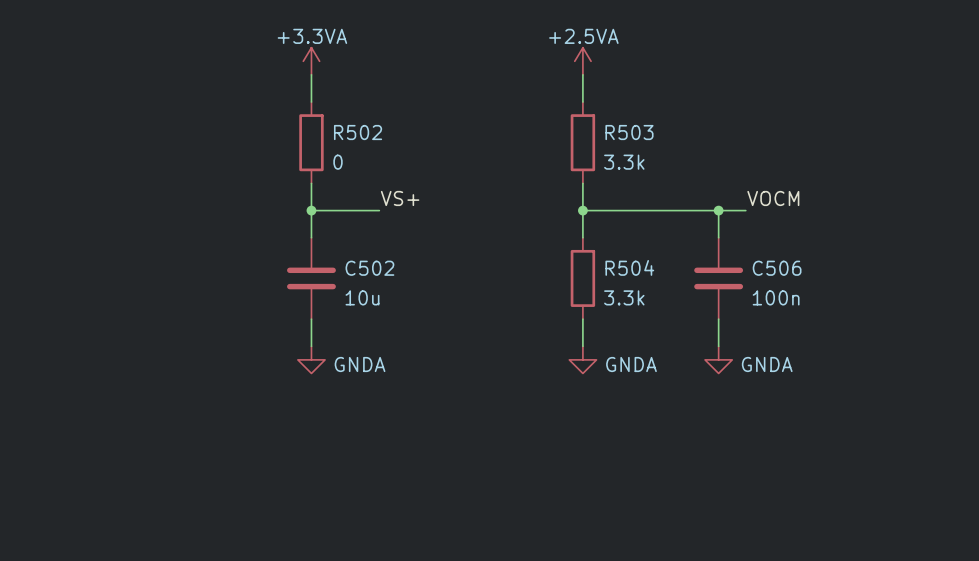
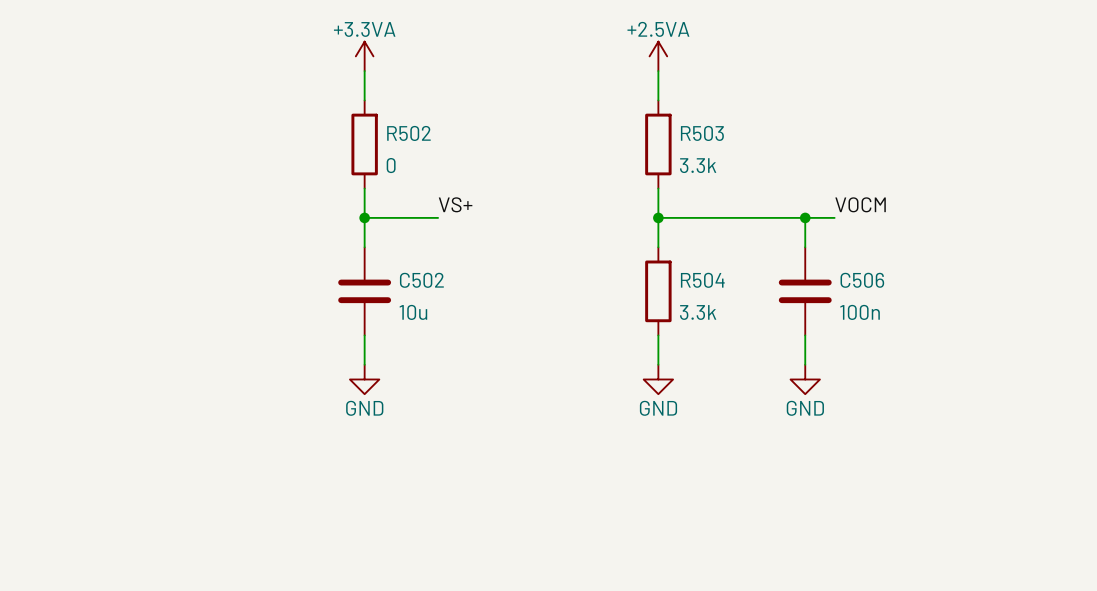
power symbol: GNDA (311, 359) -> GND (364, 379)
power symbol: GNDA (582, 359) -> GND (658, 379)
power symbol: GNDA (718, 359) -> GND (805, 379)

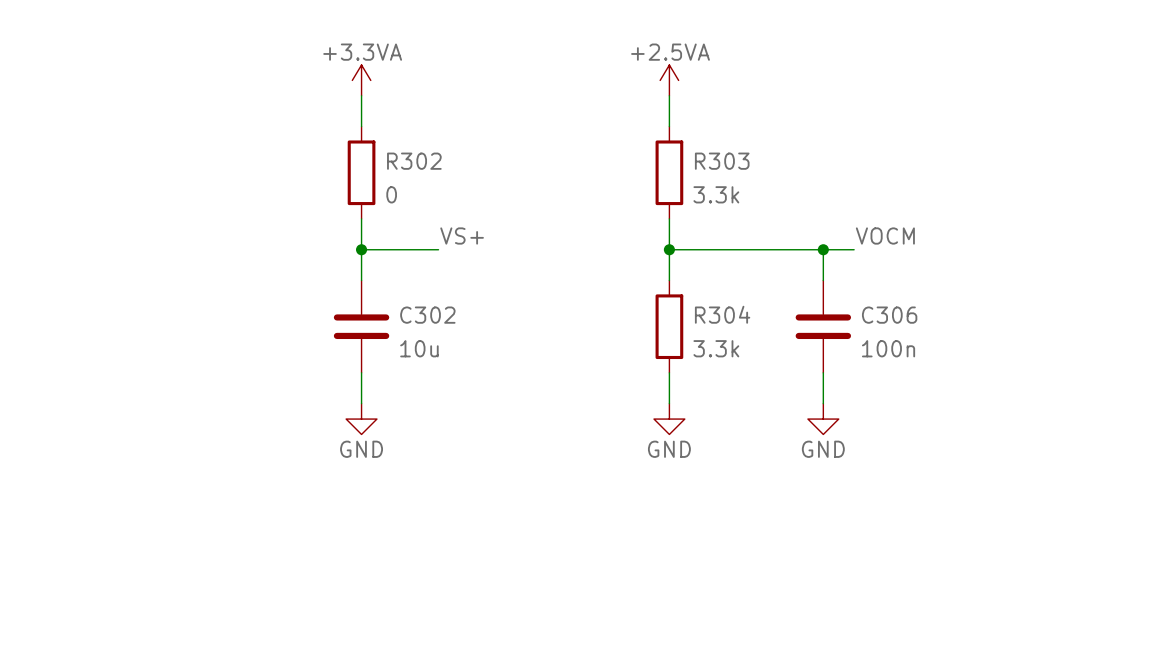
R502 name: R502 (408, 133) -> R302 (414, 161)
R503 name: R503 (702, 133) -> R303 (722, 161)
C502 name: C502 (421, 280) -> C302 (427, 315)
R504 name: R504 (702, 280) -> R304 (722, 314)
C506 name: C506 (862, 280) -> C306 (889, 315)

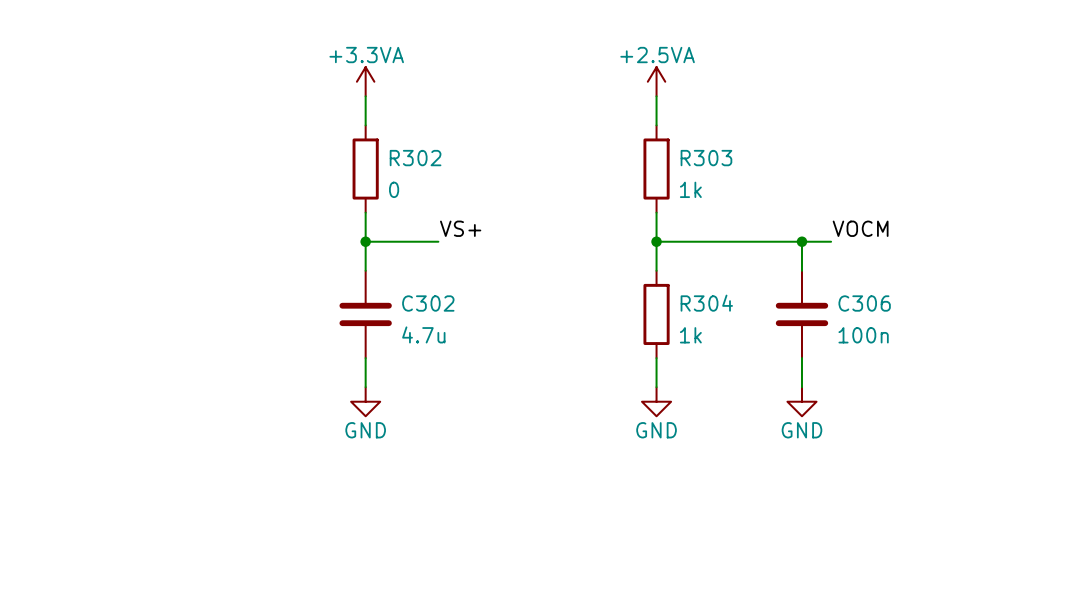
R303 value: 3.3k (716, 194) -> 1k (690, 189)
C302 value: 10u (419, 348) -> 4.7u (423, 334)
R304 value: 3.3k (716, 348) -> 1k (690, 335)

